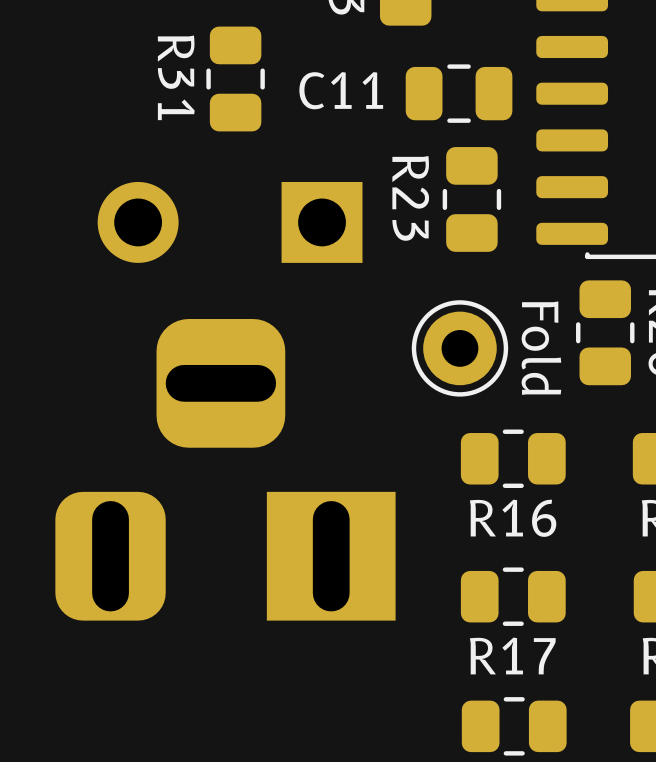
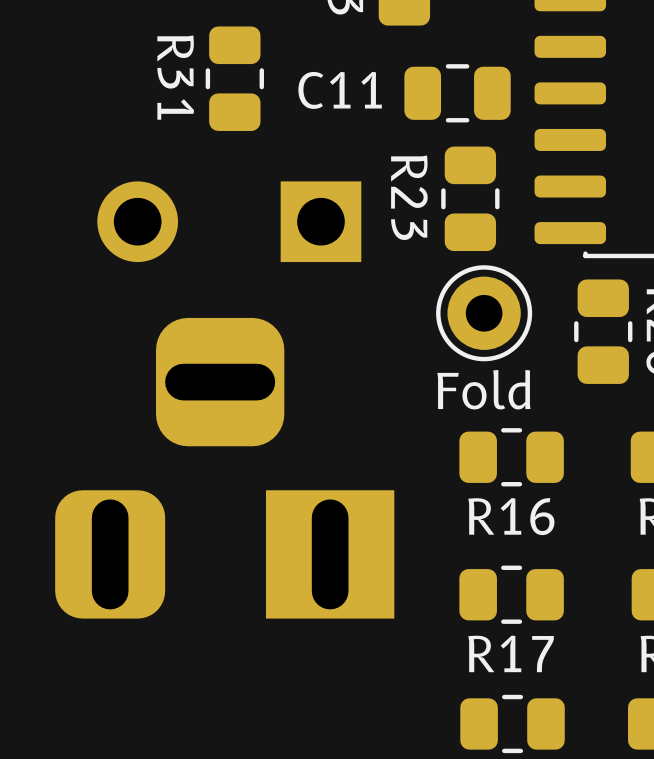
part position: (459, 348) -> (484, 313)
part value rotation: 0° (541, 348) -> 90° counterclockwise (483, 389)

